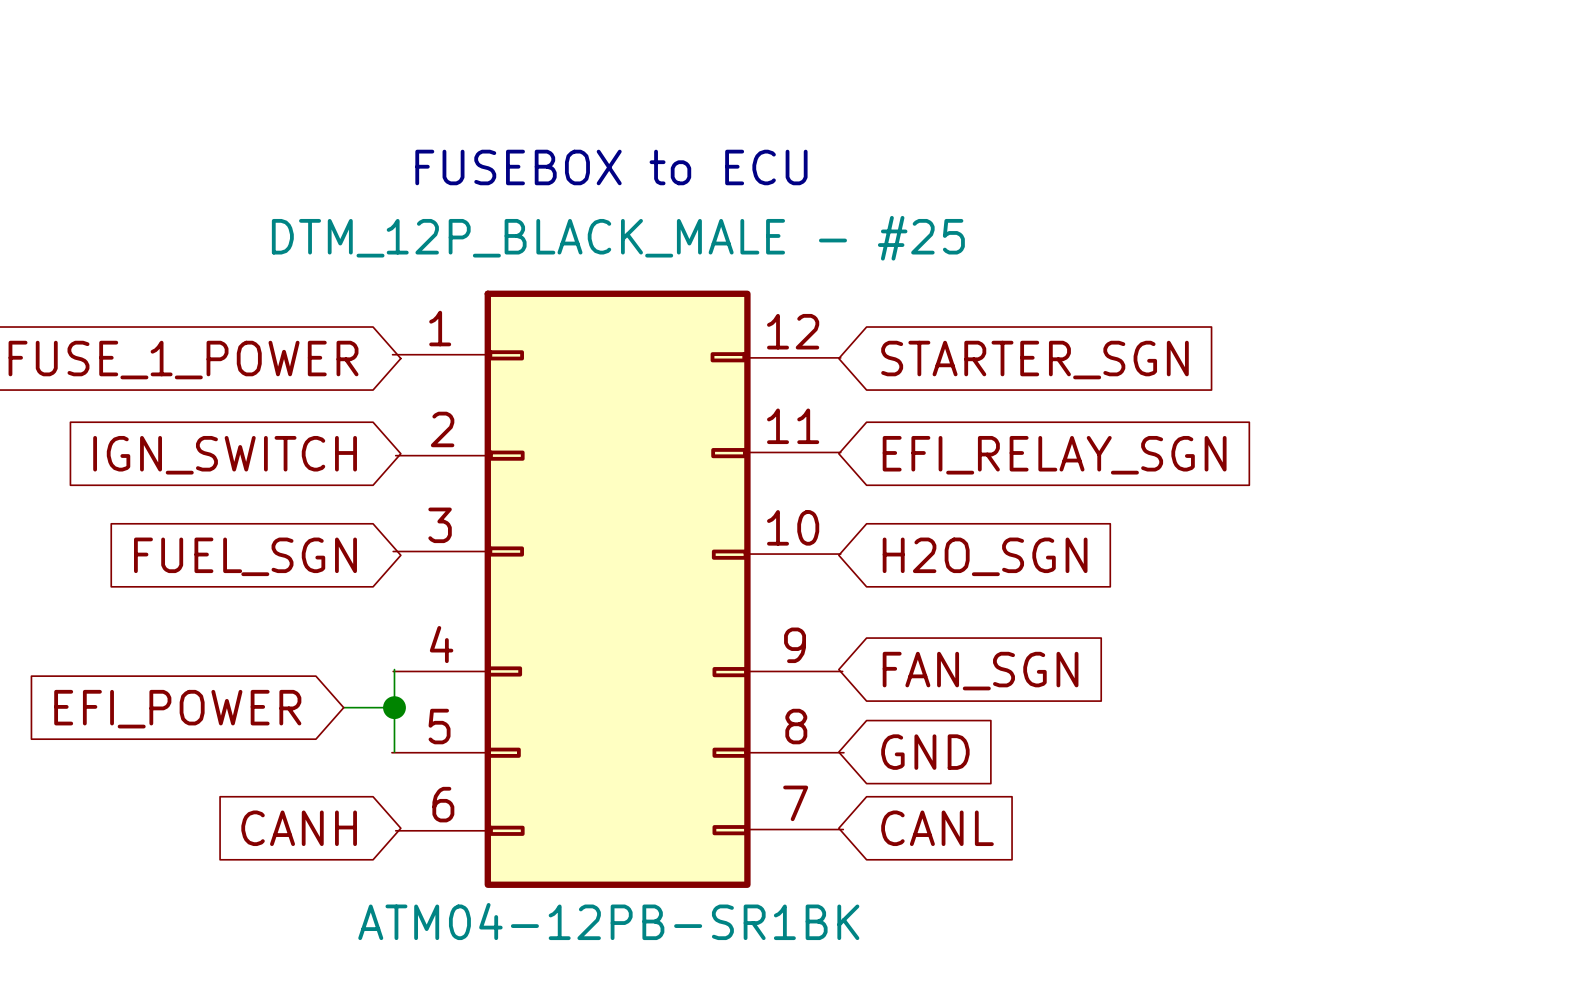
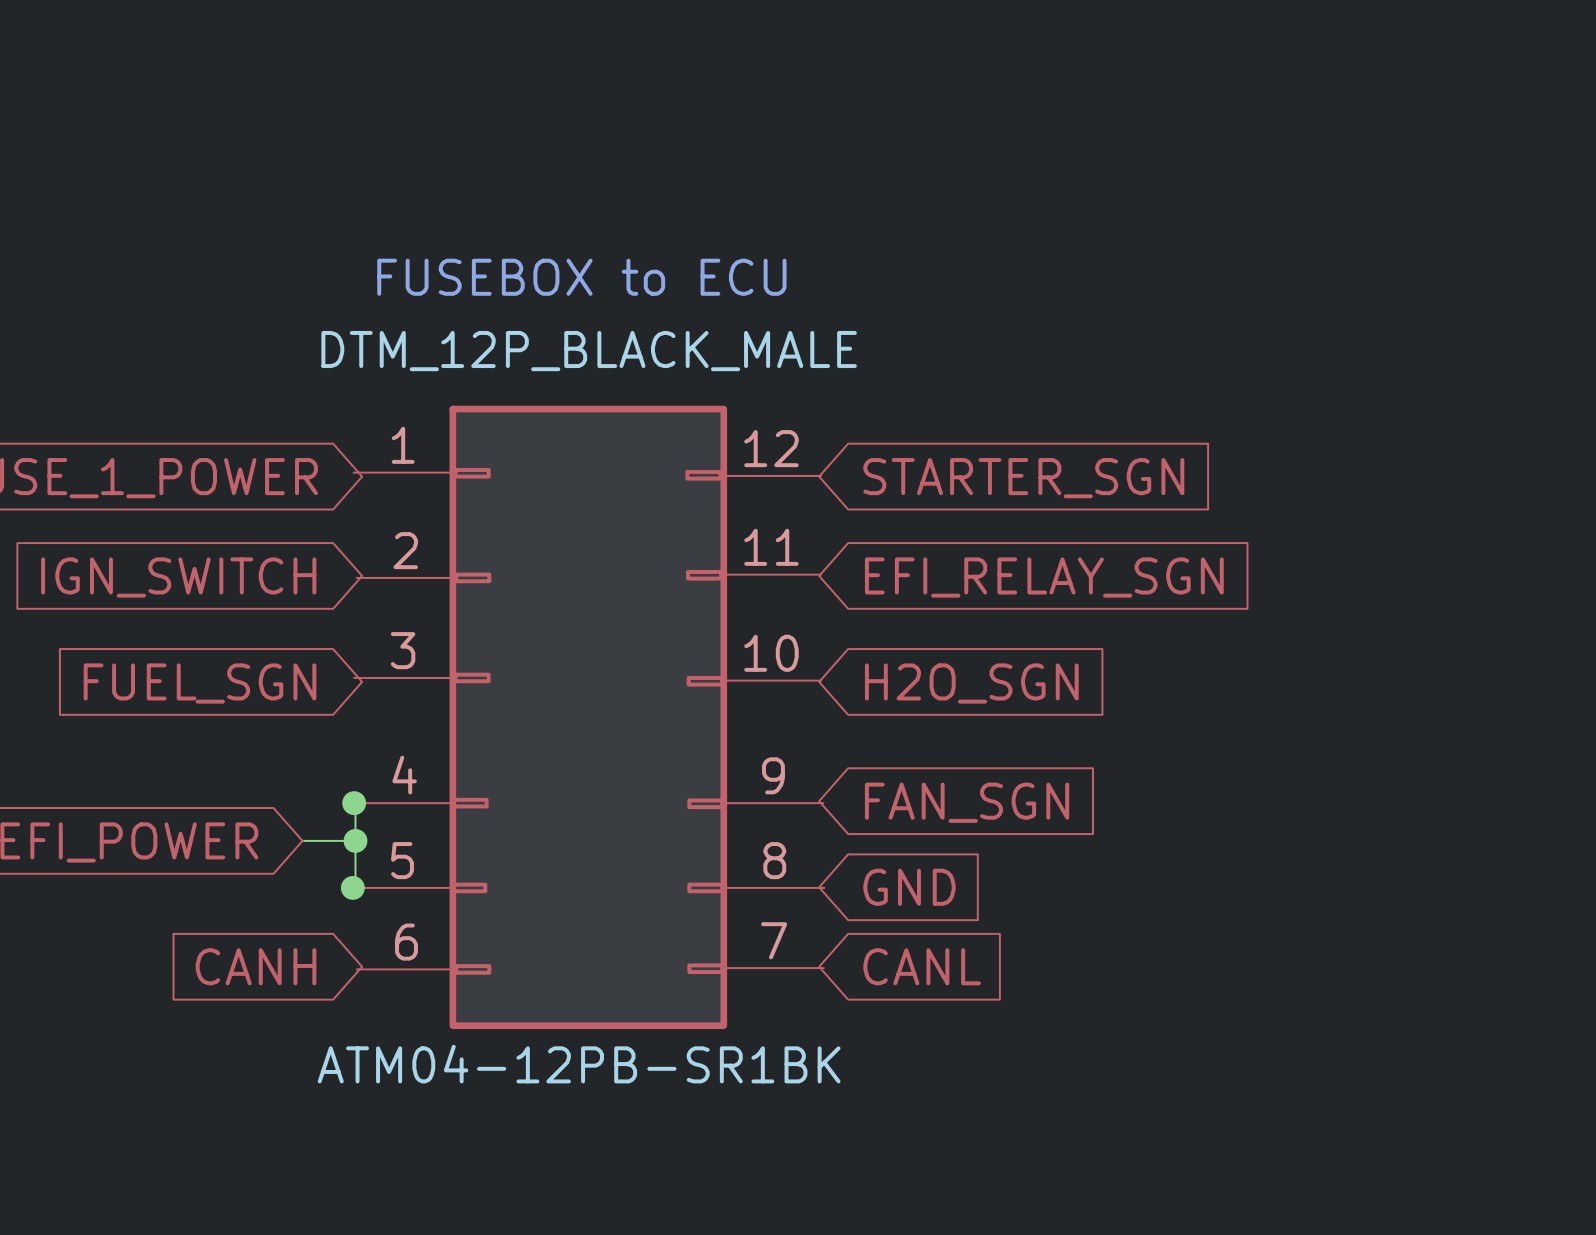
part value: DTM_12P_BLACK_MALE - #25 (618, 238) -> DTM_12P_BLACK_MALE (589, 351)
junction: none -> (354, 803)
junction: none -> (352, 887)

